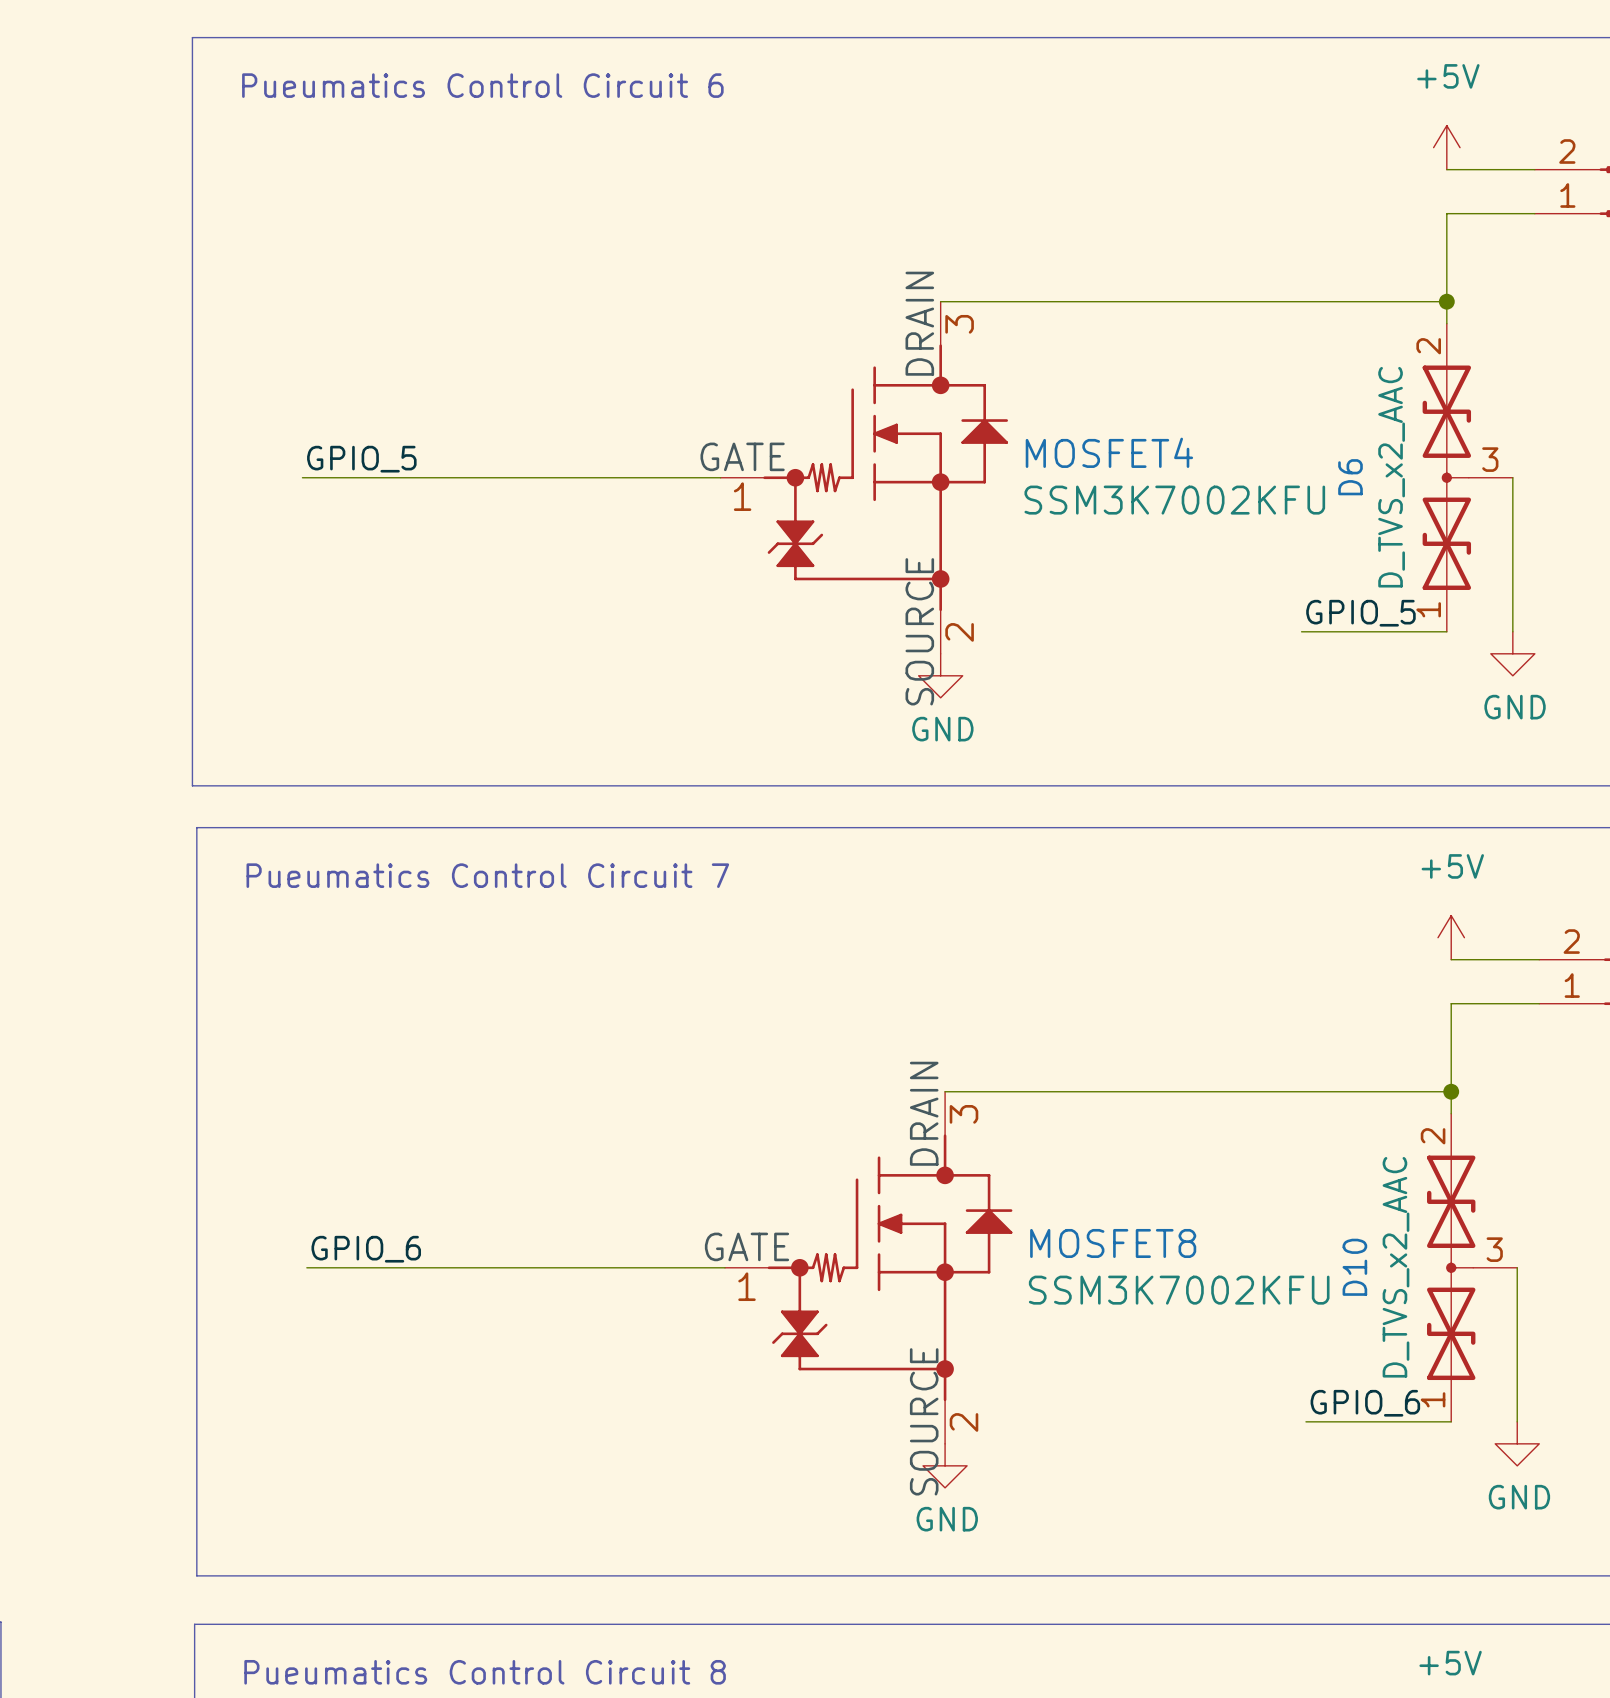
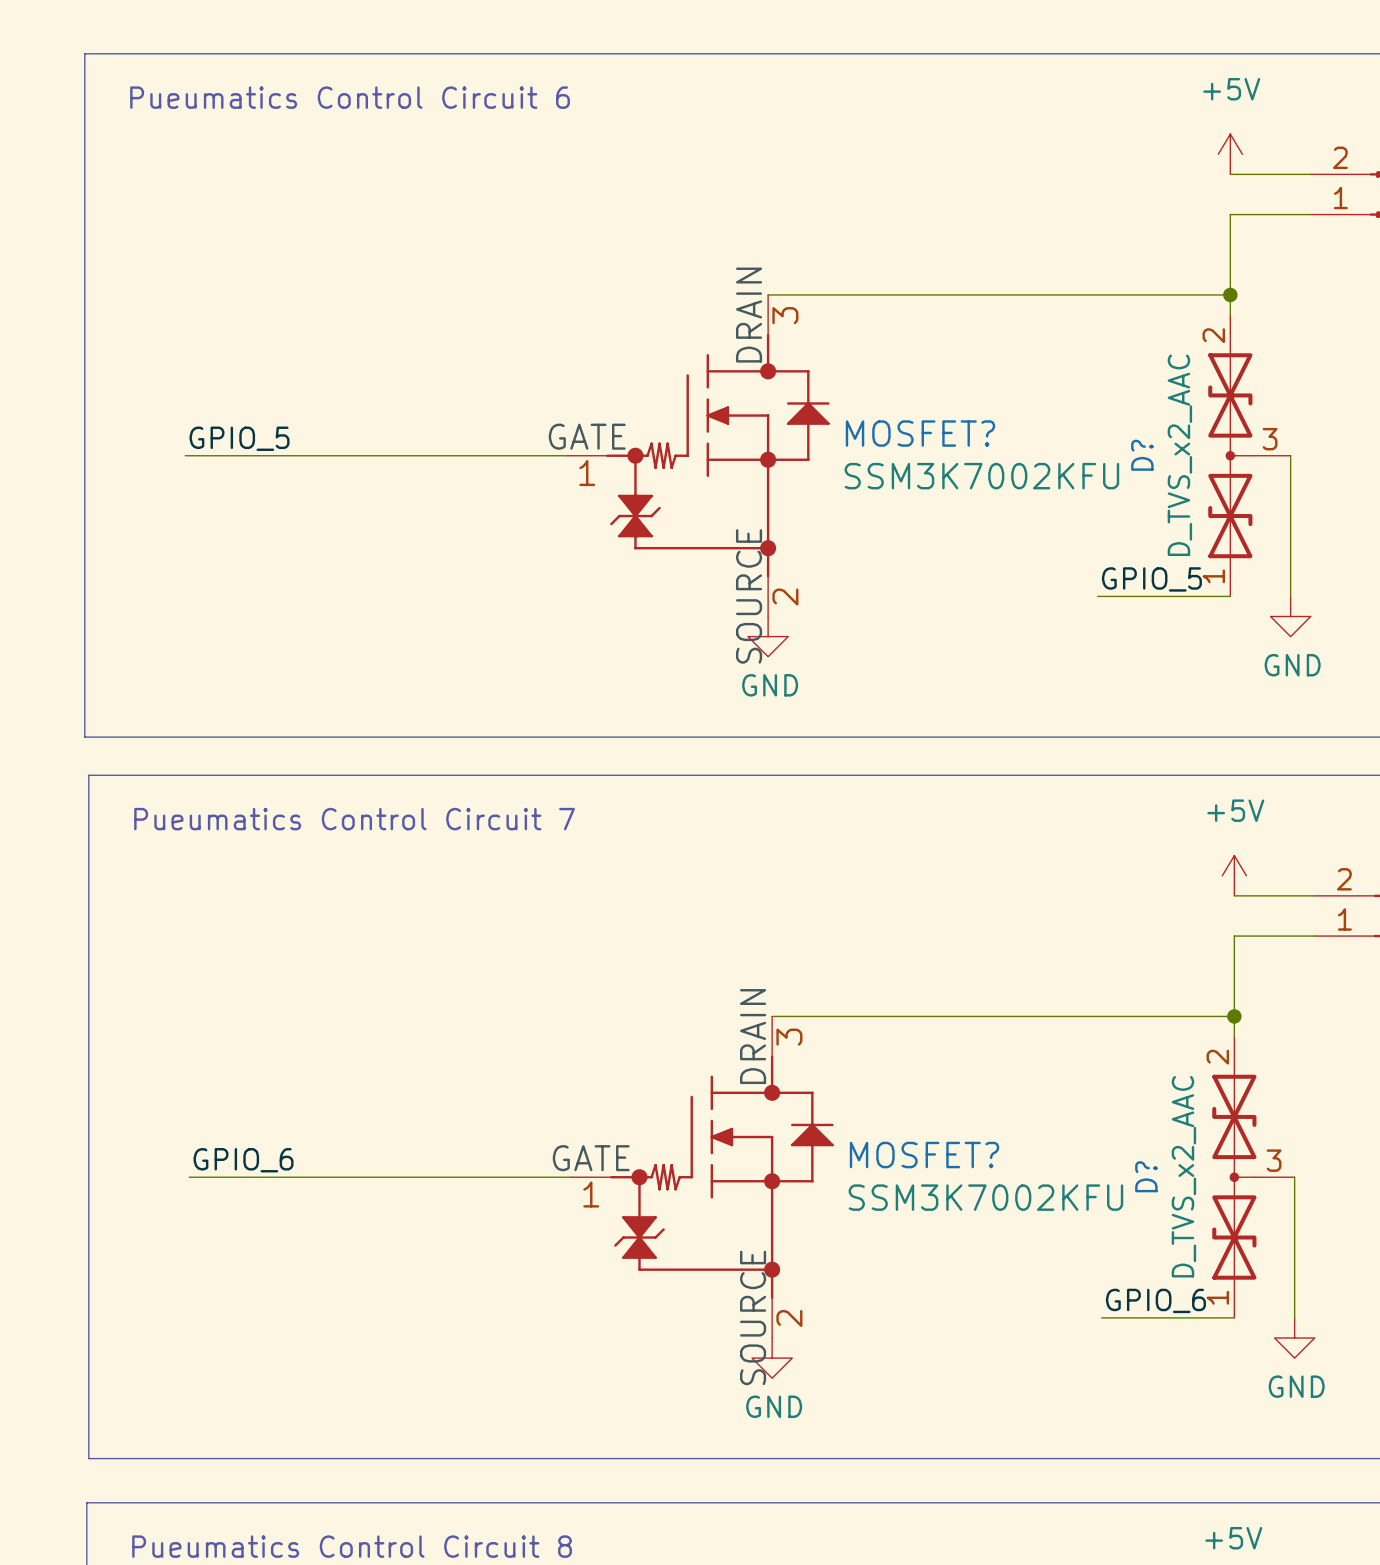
MOSFET4 name: MOSFET4 (1109, 452) -> MOSFET? (920, 433)
D6 name: D6 (1350, 477) -> D? (1142, 455)
MOSFET8 name: MOSFET8 (1113, 1243) -> MOSFET? (924, 1155)
D10 name: D10 (1354, 1267) -> D? (1146, 1176)

